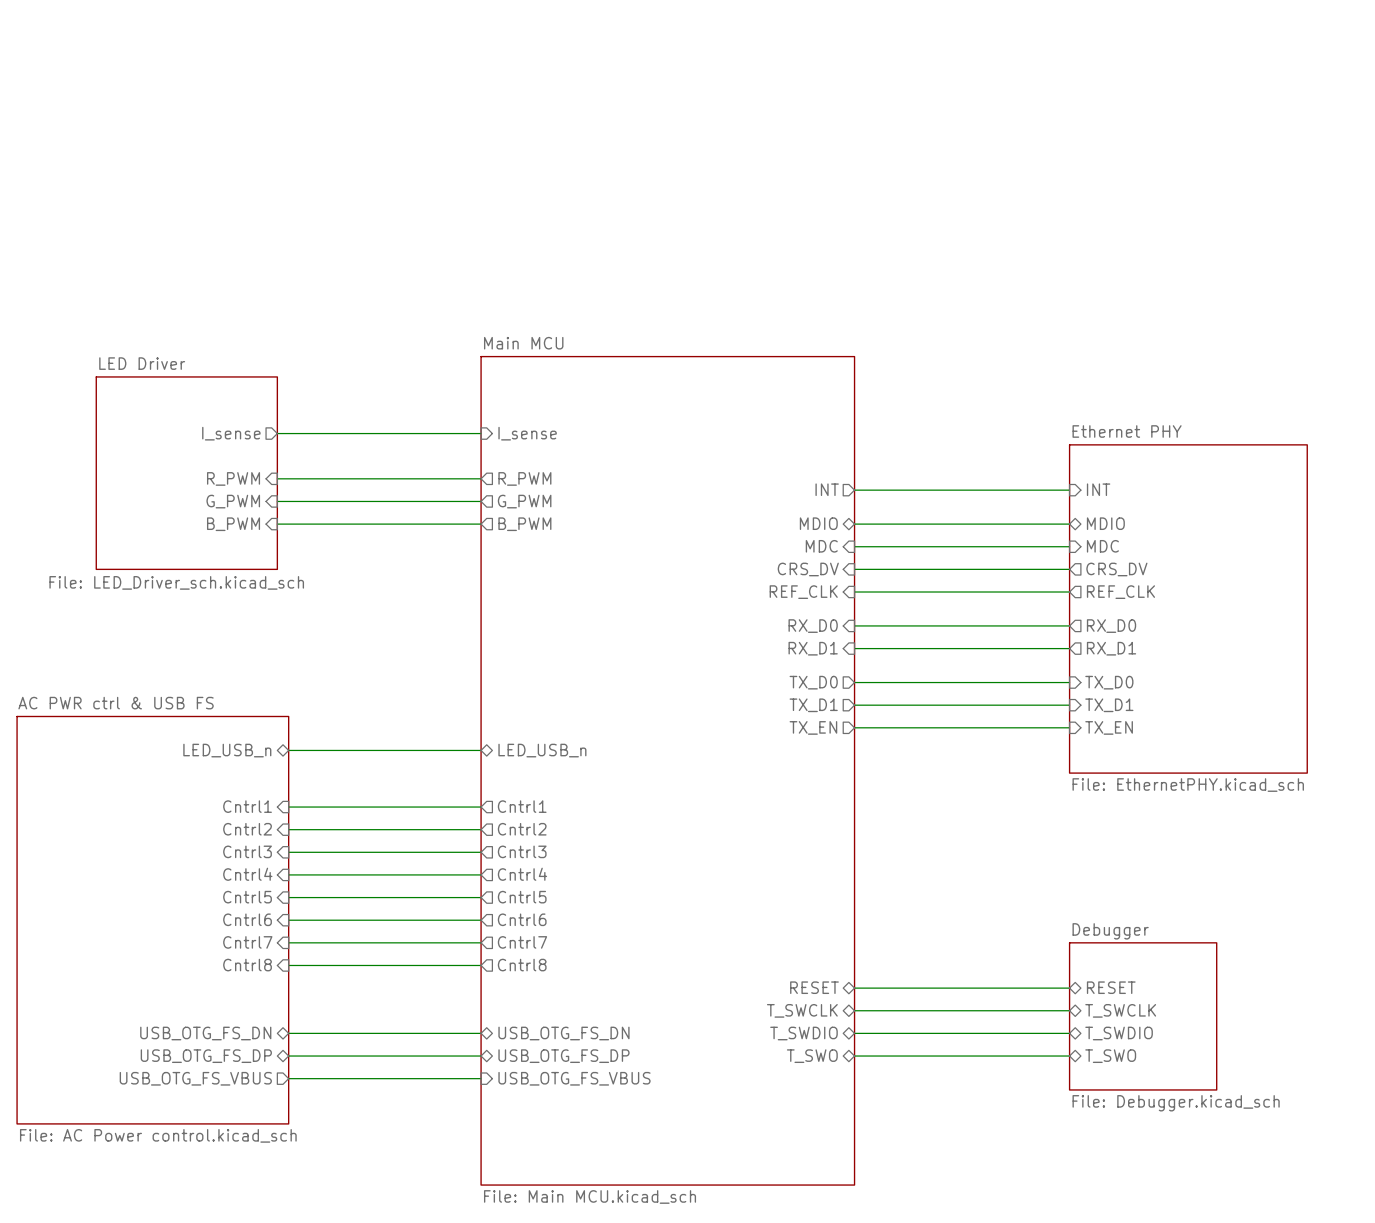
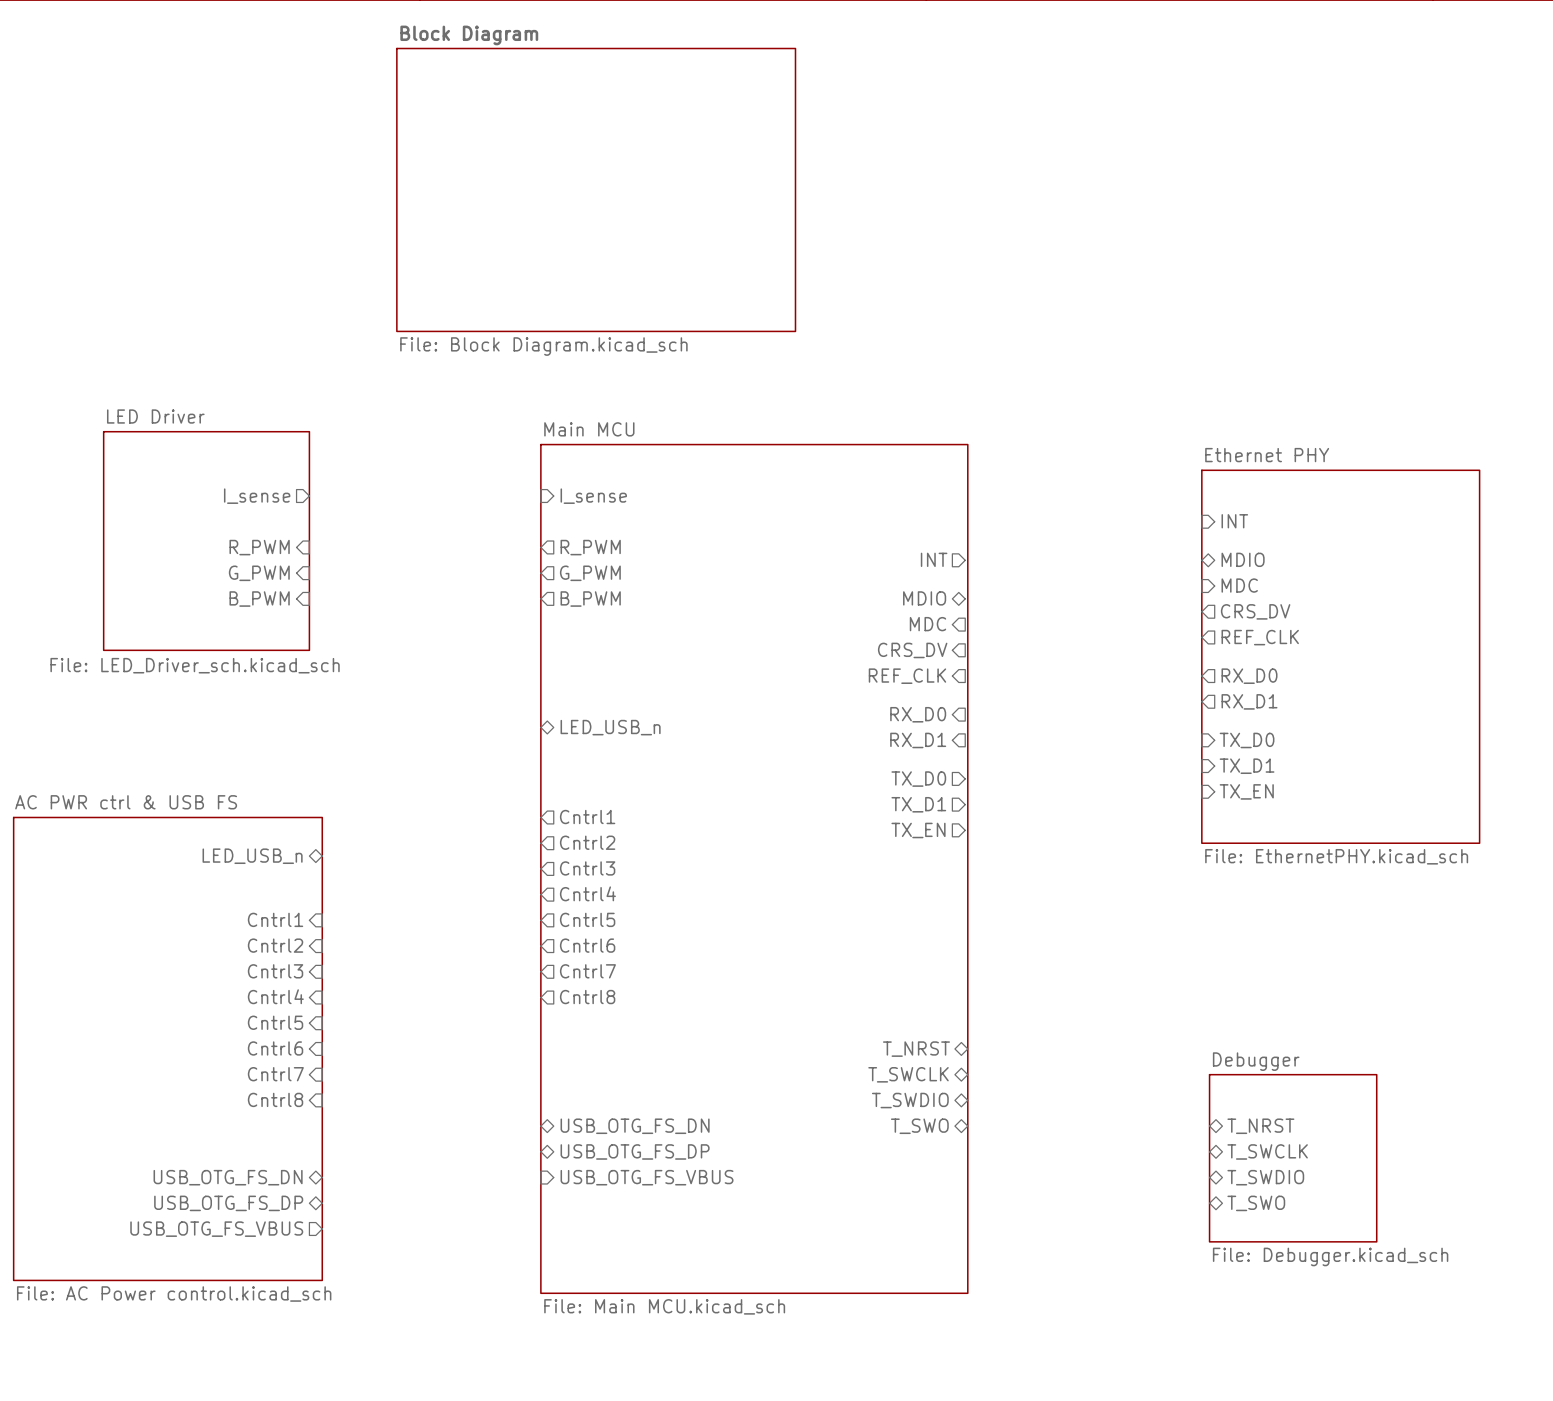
sheet Block Diagram: none -> File: Block Diagram.kicad_sch (596, 189)
wire: (277, 433) (481, 433) -> none
wire: (277, 478) (481, 478) -> none
sheet pin position: INT (1098, 489) -> INT (1234, 521)
wire: (854, 490) (1069, 490) -> none
wire: (277, 501) (481, 501) -> none
sheet pin position: MDIO (1105, 523) -> MDIO (1243, 559)
wire: (277, 524) (481, 524) -> none
wire: (854, 524) (1069, 524) -> none
wire: (854, 546) (1069, 546) -> none
sheet pin position: MDC (1102, 546) -> MDC (1239, 585)
wire: (854, 569) (1069, 569) -> none
sheet pin position: CRS_DV (1116, 569) -> CRS_DV (1255, 611)
sheet Ethernet PHY: none -> File: EthernetPHY.kicad_sch (1340, 656)
wire: (854, 592) (1069, 592) -> none
sheet pin position: REF_CLK (1120, 592) -> REF_CLK (1260, 637)
sheet Ethernet PHY: File: EthernetPHY.kicad_sch (1188, 608) -> none
wire: (854, 625) (1069, 625) -> none
sheet pin position: RX_D0 (1111, 626) -> RX_D0 (1249, 676)
wire: (854, 648) (1069, 648) -> none
sheet pin position: RX_D1 (1111, 648) -> RX_D1 (1249, 701)
wire: (854, 682) (1069, 682) -> none
sheet pin position: TX_D0 (1109, 682) -> TX_D0 (1247, 740)
wire: (854, 705) (1069, 705) -> none
sheet pin position: TX_D1 (1109, 705) -> TX_D1 (1247, 766)
sheet pin: none -> Cntrl1 (587, 817)
wire: (854, 727) (1069, 727) -> none
sheet pin position: TX_EN (1109, 727) -> TX_EN (1246, 791)
sheet pin: none -> Cntrl2 (587, 842)
wire: (288, 750) (481, 750) -> none
sheet pin position: LED_USB_n (542, 750) -> LED_USB_n (610, 727)
sheet pin: none -> Cntrl3 (587, 868)
sheet Main MCU: none -> File: Main MCU.kicad_sch (754, 868)
sheet Main MCU: File: Main MCU.kicad_sch (667, 770) -> none
sheet pin: none -> Cntrl4 (587, 893)
sheet pin: Cntrl1 (522, 806) -> Cntrl5 (587, 919)
wire: (288, 807) (481, 807) -> none
wire: (288, 829) (481, 829) -> none
sheet pin: Cntrl2 (522, 829) -> Cntrl6 (587, 945)
sheet pin: Cntrl3 (522, 851) -> Cntrl7 (587, 971)
wire: (288, 852) (481, 852) -> none
wire: (288, 874) (481, 874) -> none
sheet pin: Cntrl4 (522, 874) -> Cntrl8 (587, 997)
wire: (288, 897) (481, 897) -> none
sheet pin: Cntrl5 (522, 897) -> none
sheet pin: Cntrl6 (522, 919) -> none
wire: (288, 920) (481, 920) -> none
sheet pin: none -> T_NRST (916, 1049)
wire: (288, 942) (481, 942) -> none
sheet pin: Cntrl7 (522, 942) -> none
wire: (288, 965) (481, 965) -> none
sheet pin: Cntrl8 (522, 965) -> none
sheet pin: RESET (814, 987) -> none
sheet pin: RESET (1111, 987) -> T_NRST (1260, 1126)
sheet pin: none -> USB_OTG_FS_DN (635, 1126)
wire: (854, 988) (1069, 988) -> none
sheet pin position: T_SWCLK (802, 1010) -> T_SWCLK (908, 1074)
wire: (854, 1010) (1069, 1010) -> none
wire: (288, 1033) (481, 1033) -> none
sheet pin shape: bidirectional (563, 1033) -> input (647, 1177)
sheet pin: USB_OTG_FS_DN (563, 1033) -> USB_OTG_FS_VBUS (647, 1177)
sheet pin position: T_SWDIO (803, 1033) -> T_SWDIO (910, 1100)
wire: (854, 1033) (1069, 1033) -> none
wire: (288, 1056) (481, 1056) -> none
sheet pin position: USB_OTG_FS_DP (563, 1056) -> USB_OTG_FS_DP (635, 1151)
sheet pin position: T_SWO (812, 1056) -> T_SWO (919, 1126)
wire: (854, 1056) (1069, 1056) -> none
wire: (288, 1078) (481, 1078) -> none
sheet pin: USB_OTG_FS_VBUS (574, 1078) -> none

